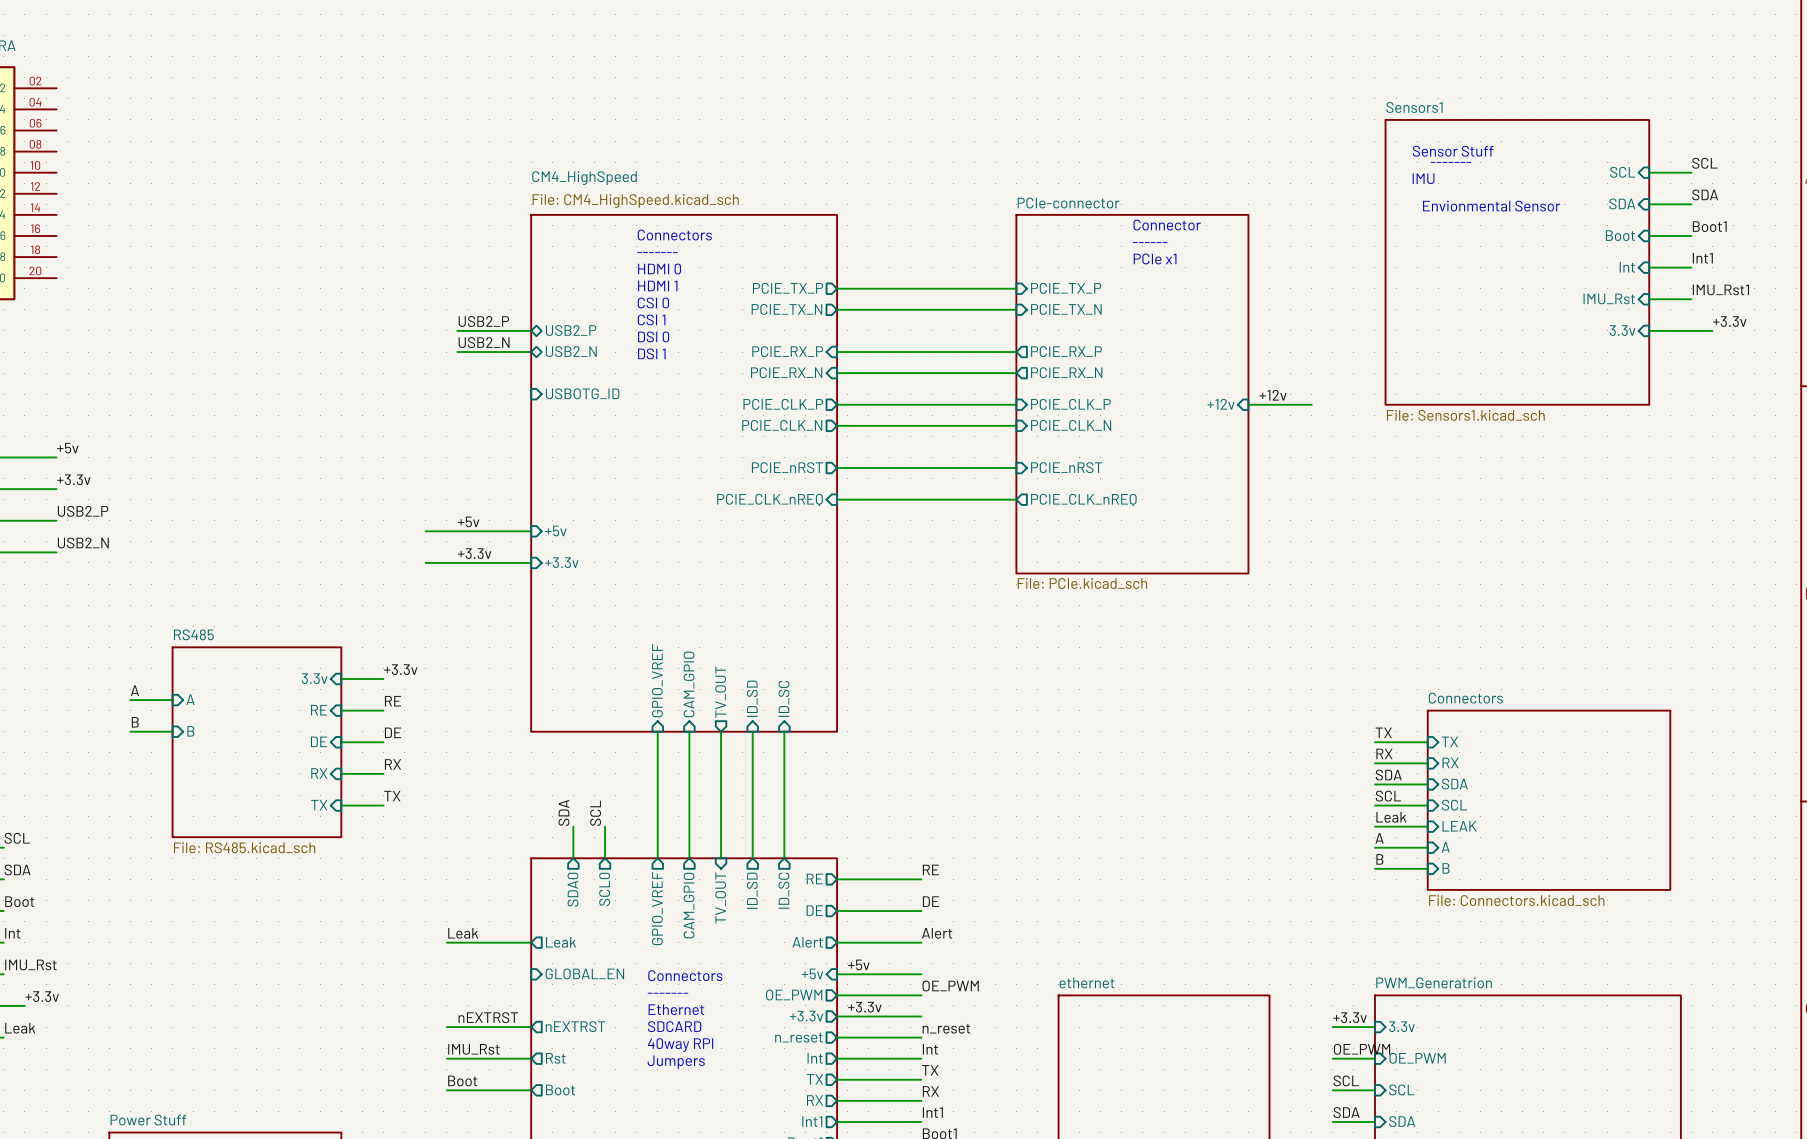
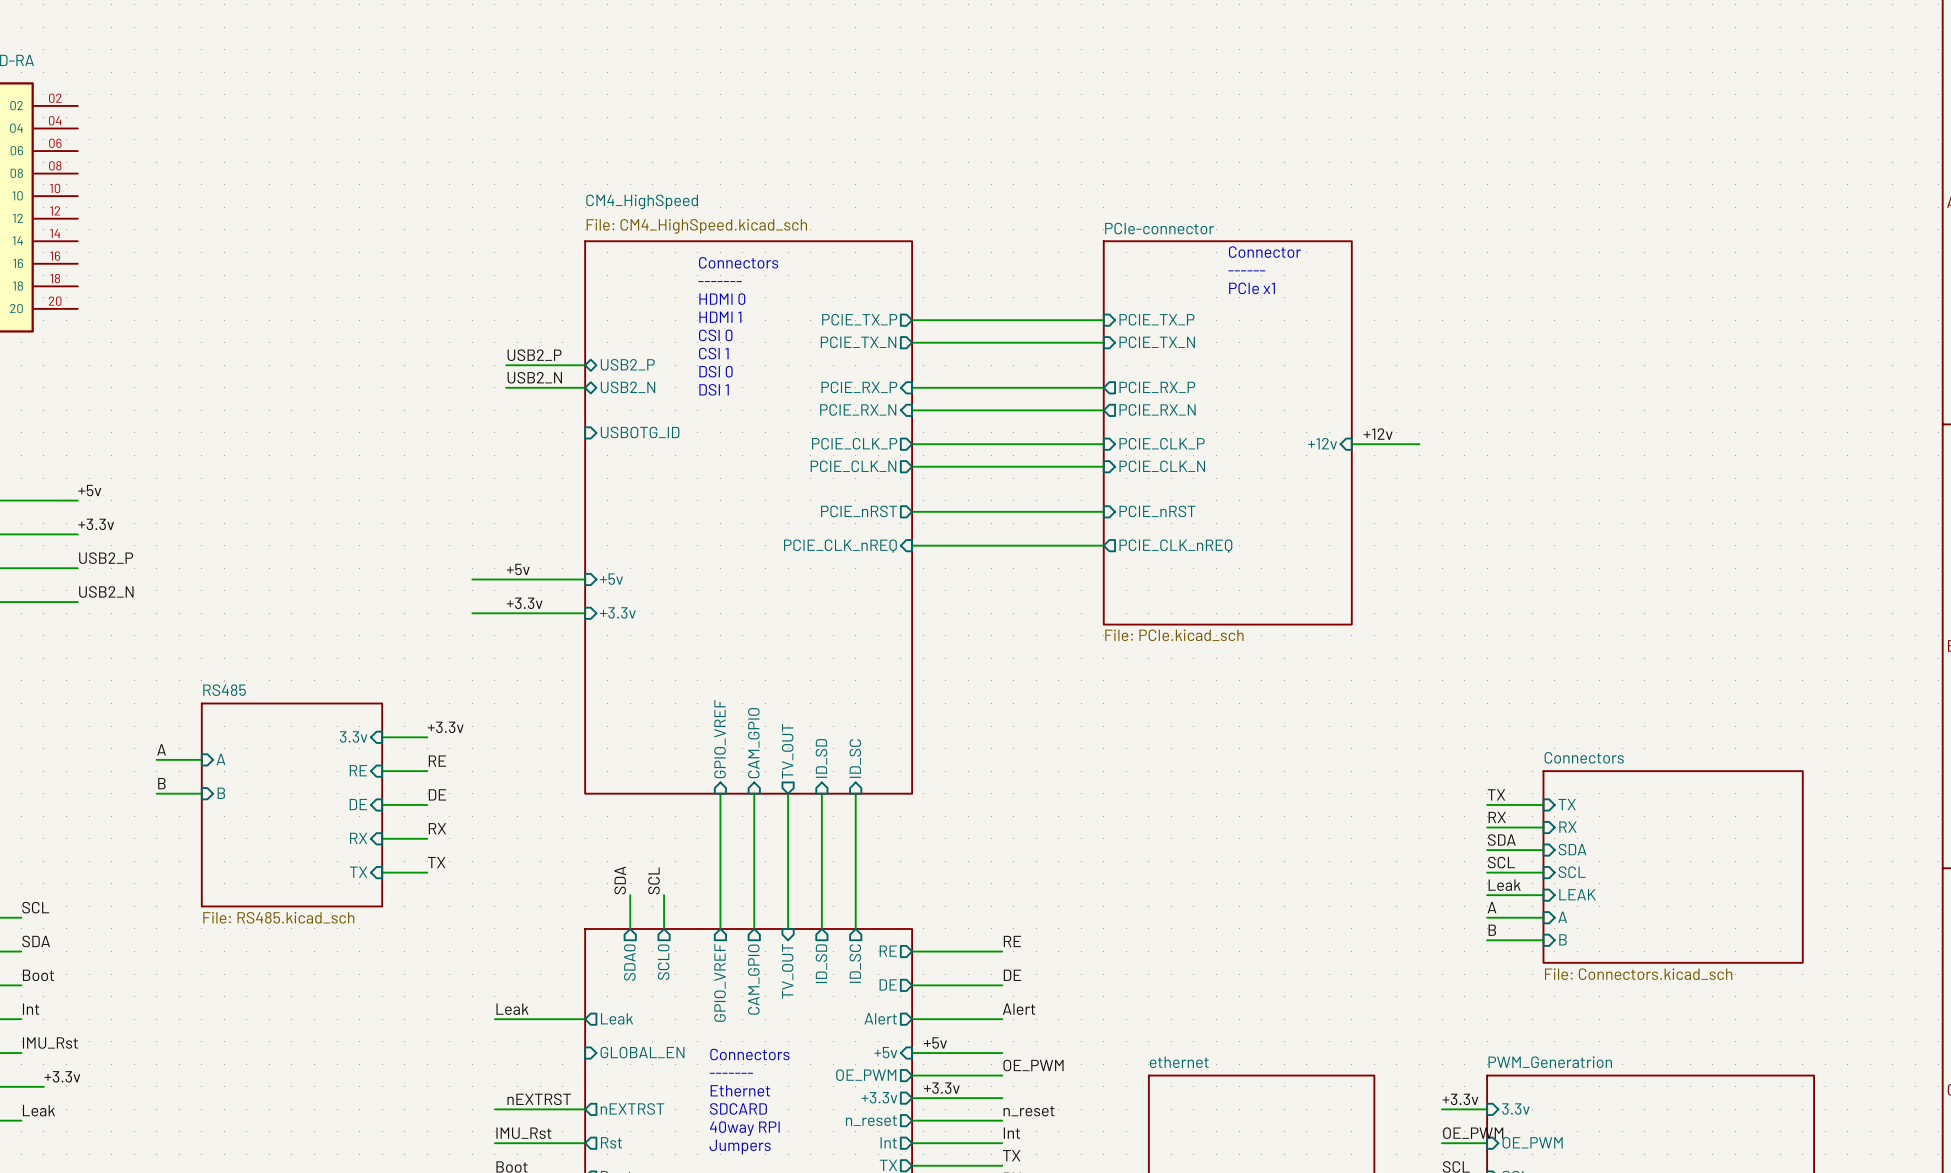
text: Sensor Stuff (1453, 151) -> none
text: ------- (1450, 162) -> none
label: SCL (1704, 163) -> none
sheet pin: SCL (1622, 172) -> none
wire: (1649, 172) (1691, 172) -> none
text: IMU (1423, 178) -> none
label: SDA (1705, 194) -> none
sheet pin: SDA (1622, 203) -> none
wire: (1649, 204) (1691, 204) -> none
text: Envionmental Sensor (1491, 206) -> none
label: Boot1 (1709, 226) -> none
sheet pin: Boot (1620, 235) -> none
wire: (1649, 235) (1691, 235) -> none
label: Int1 (1702, 258) -> none
sheet Sensors1: File: Sensors1.kicad_sch (1517, 262) -> none
sheet pin: Int (1627, 267) -> none
wire: (1649, 267) (1691, 267) -> none
label: IMU_Rst1 (1720, 289) -> none
sheet pin: IMU_Rst (1609, 298) -> none
wire: (1649, 299) (1691, 299) -> none
label: +3.3v (1729, 321) -> none
sheet pin: 3.3v (1622, 330) -> none
wire: (1649, 330) (1712, 330) -> none

